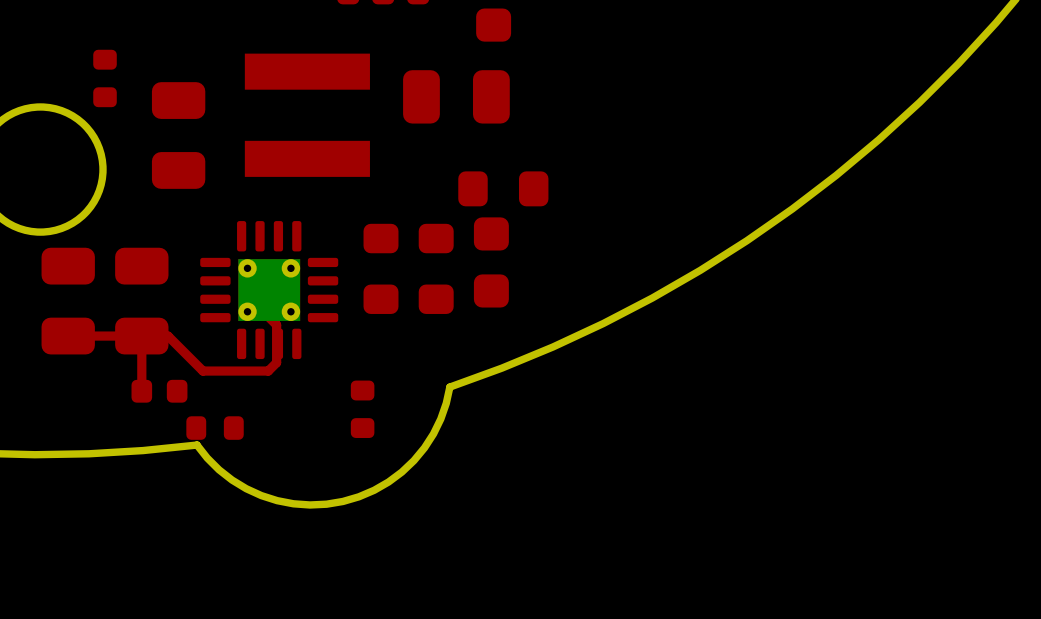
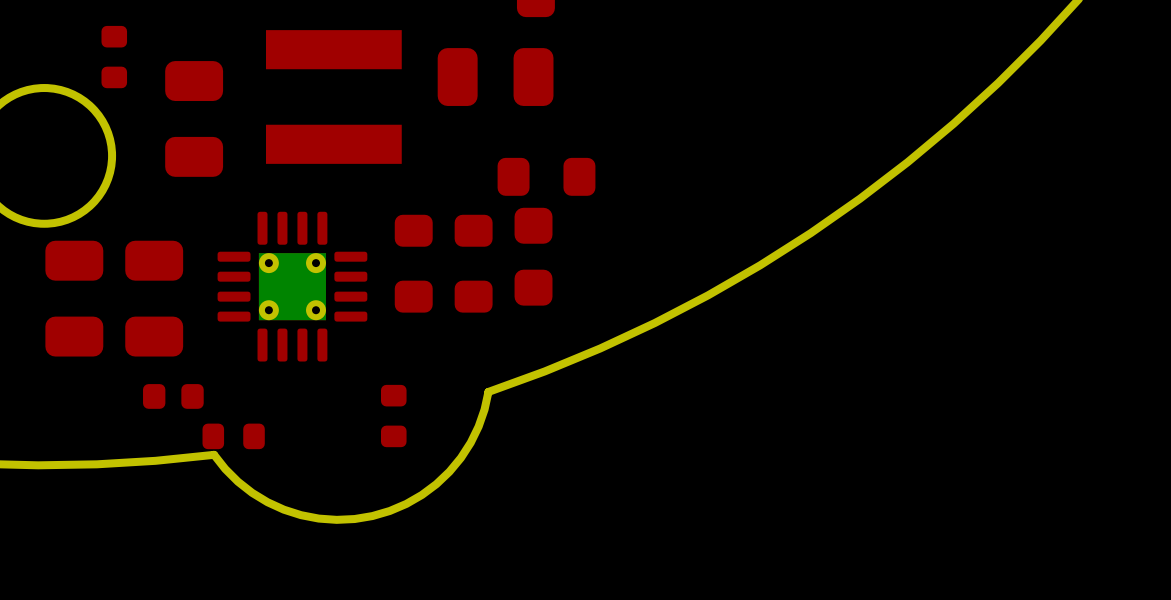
top track: (247, 311) (263, 311) (276, 325) (276, 362) (268, 371) (202, 371) (167, 336) (68, 336) -> none
top track: (141, 336) (141, 391) -> none

